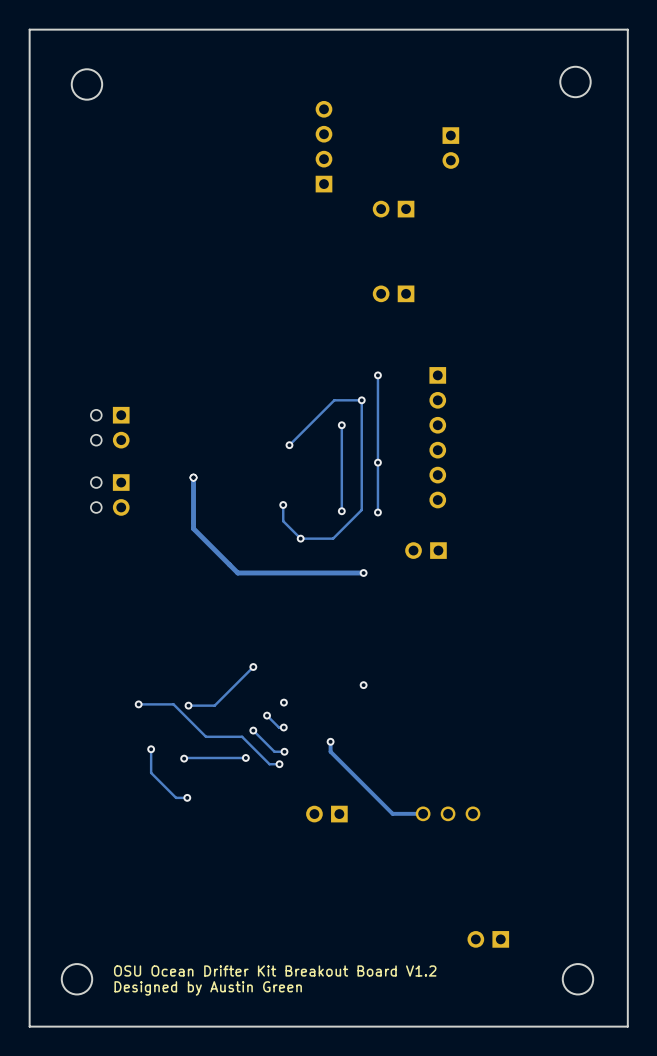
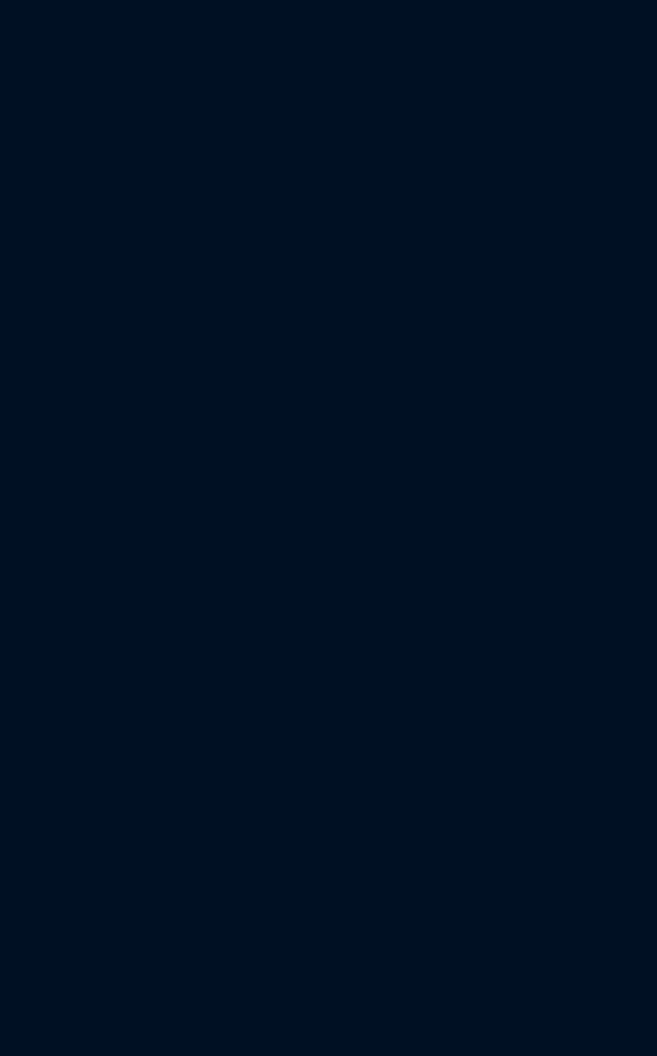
board edge: (627, 29) (29, 29) (29, 1026) (627, 1026) (627, 29) -> none
round board edge: [559, 65, 592, 99] -> none
round board edge: [70, 68, 104, 101] -> none
part: (323, 146) -> none
part: (450, 148) -> none
part: (393, 209) -> none
part: (393, 293) -> none
track: (377, 375) (377, 512) -> none
via: (377, 375) -> none
via: (361, 400) -> none
round board edge: [90, 409, 103, 422] -> none
track: (341, 425) (341, 511) -> none
via: (341, 425) -> none
part: (121, 427) -> none
round board edge: [90, 434, 103, 447] -> none
part: (437, 437) -> none
track: (289, 445) (334, 400) (361, 400) (361, 509) (333, 538) (300, 538) (283, 521) (283, 505) -> none
via: (289, 445) -> none
via: (377, 462) -> none
round board edge: [90, 476, 103, 489] -> none
track: (193, 477) (193, 528) (237, 572) (363, 572) -> none
via: (193, 477) -> none
part: (121, 494) -> none
round board edge: [90, 501, 103, 514] -> none
via: (283, 505) -> none
via: (341, 511) -> none
via: (377, 512) -> none
via: (300, 538) -> none
part: (425, 550) -> none
via: (363, 572) -> none
track: (253, 667) (214, 705) (188, 705) -> none
via: (253, 667) -> none
via: (363, 685) -> none
via: (283, 702) -> none
track: (138, 704) (173, 704) (205, 736) (242, 736) (269, 764) (279, 764) -> none
via: (138, 704) -> none
via: (188, 705) -> none
track: (267, 715) (278, 727) (283, 727) -> none
via: (267, 715) -> none
via: (283, 727) -> none
track: (253, 730) (274, 751) (284, 751) -> none
via: (253, 730) -> none
track: (330, 741) (330, 751) (392, 813) (423, 813) -> none
via: (330, 741) -> none
track: (151, 749) (151, 772) (176, 797) (187, 797) -> none
via: (151, 749) -> none
via: (284, 751) -> none
track: (245, 757) (184, 758) -> none
via: (245, 757) -> none
via: (184, 758) -> none
via: (279, 764) -> none
via: (187, 797) -> none
part: (448, 813) -> none
part: (326, 814) -> none
part: (488, 939) -> none
round board edge: [60, 963, 94, 996] -> none
round board edge: [561, 963, 595, 996] -> none
text: OSU Ocean Drifter Kit Breakout Board V1.2 (275, 970) -> none
text: Designed by Austin Green (208, 988) -> none

